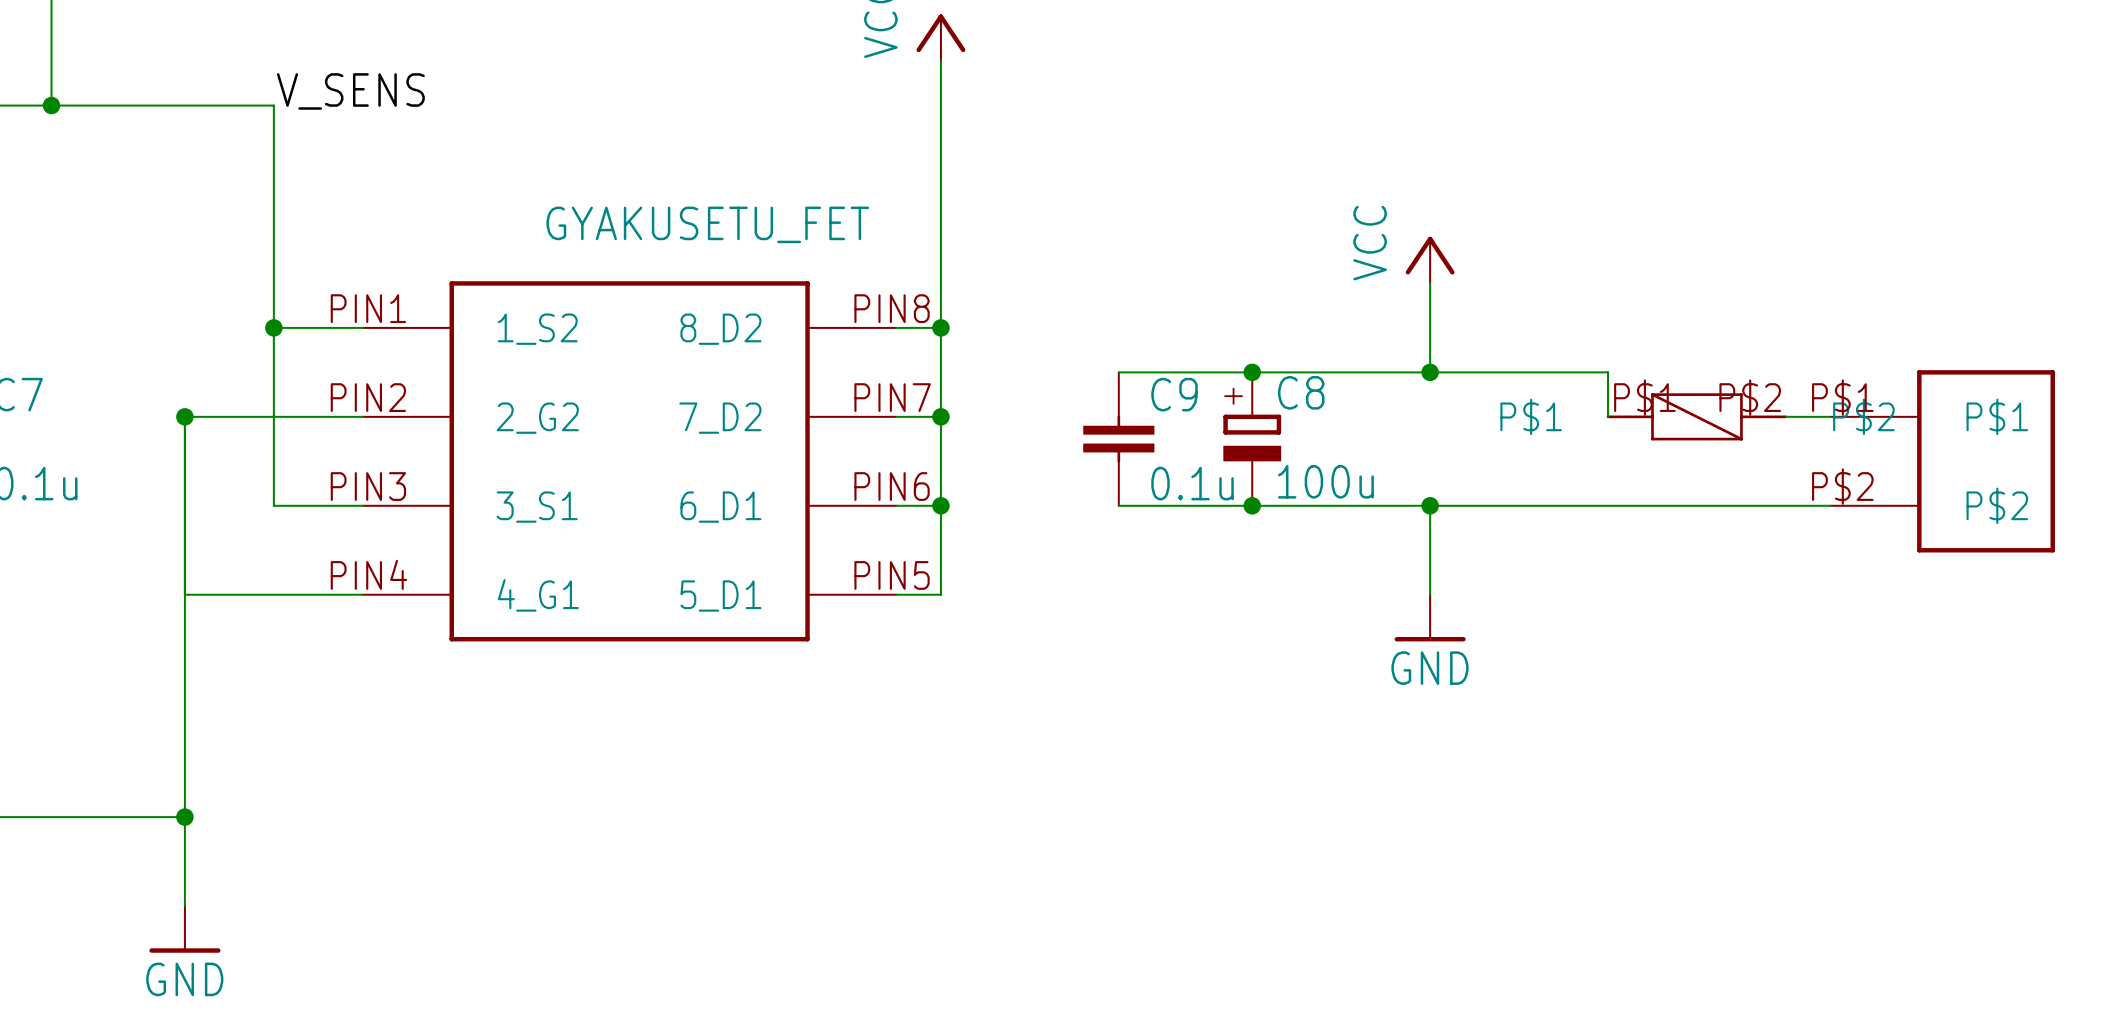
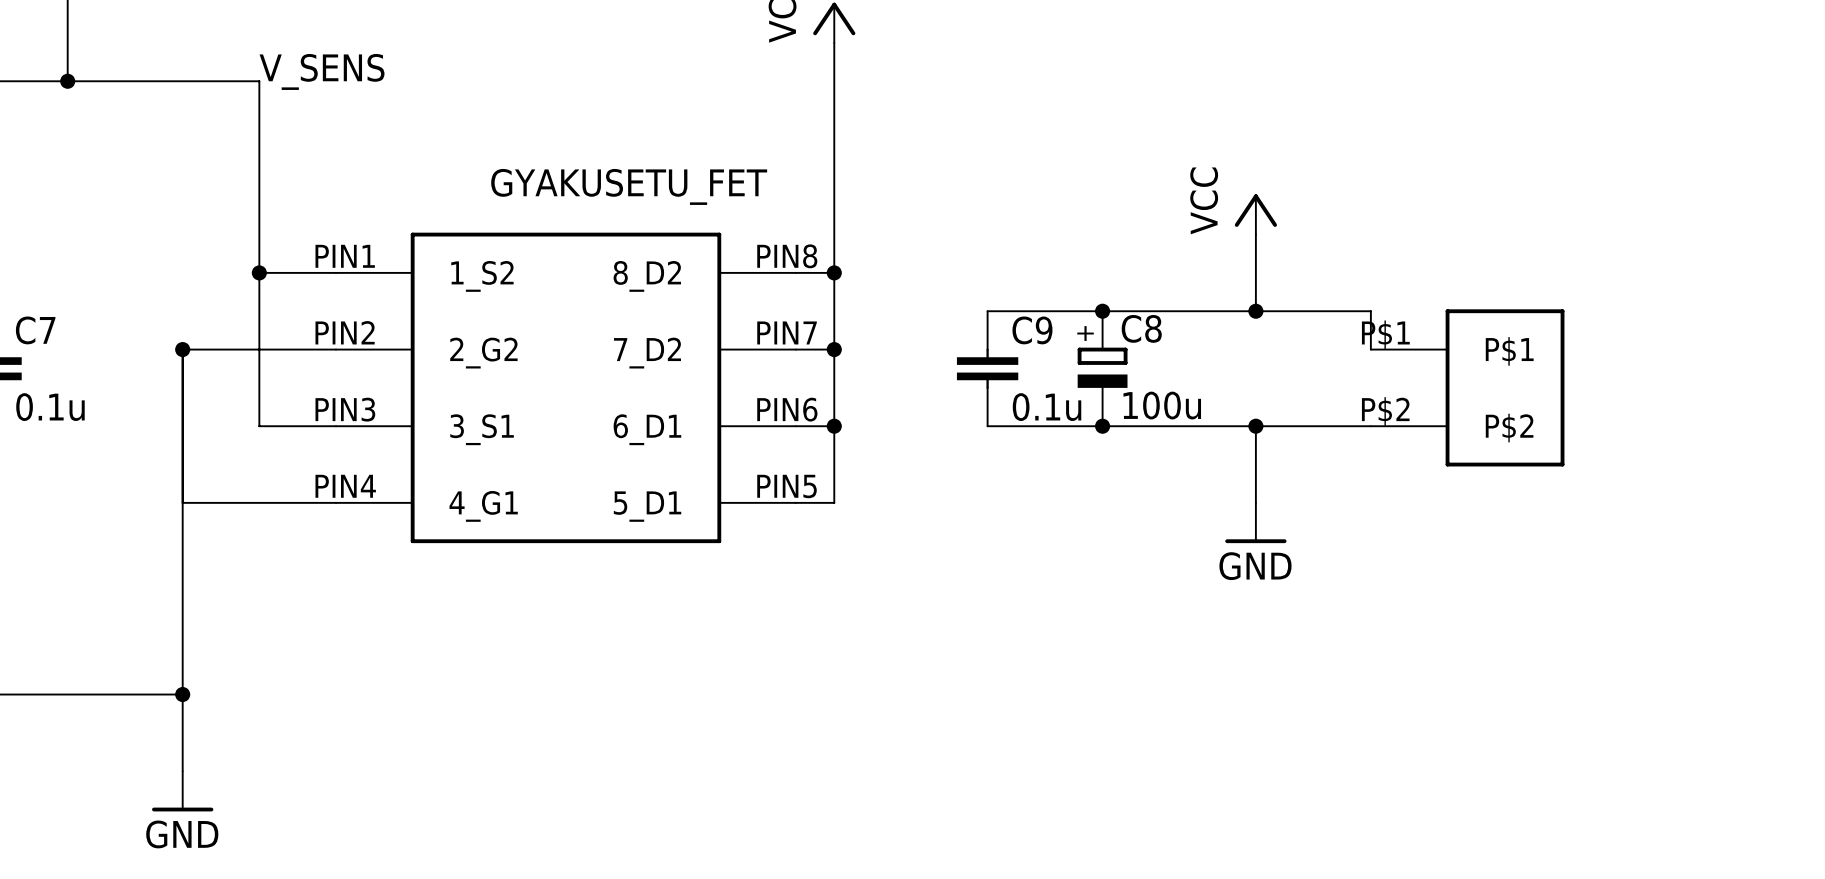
wire: (1563, 372) (1608, 372) (1608, 416) -> (1370, 311) (1370, 349)
part: (1696, 416) -> none
wire: (1785, 416) (1830, 416) -> none
part position: (1942, 461) -> (1467, 387)
wire: (1563, 505) (1830, 505) -> none

